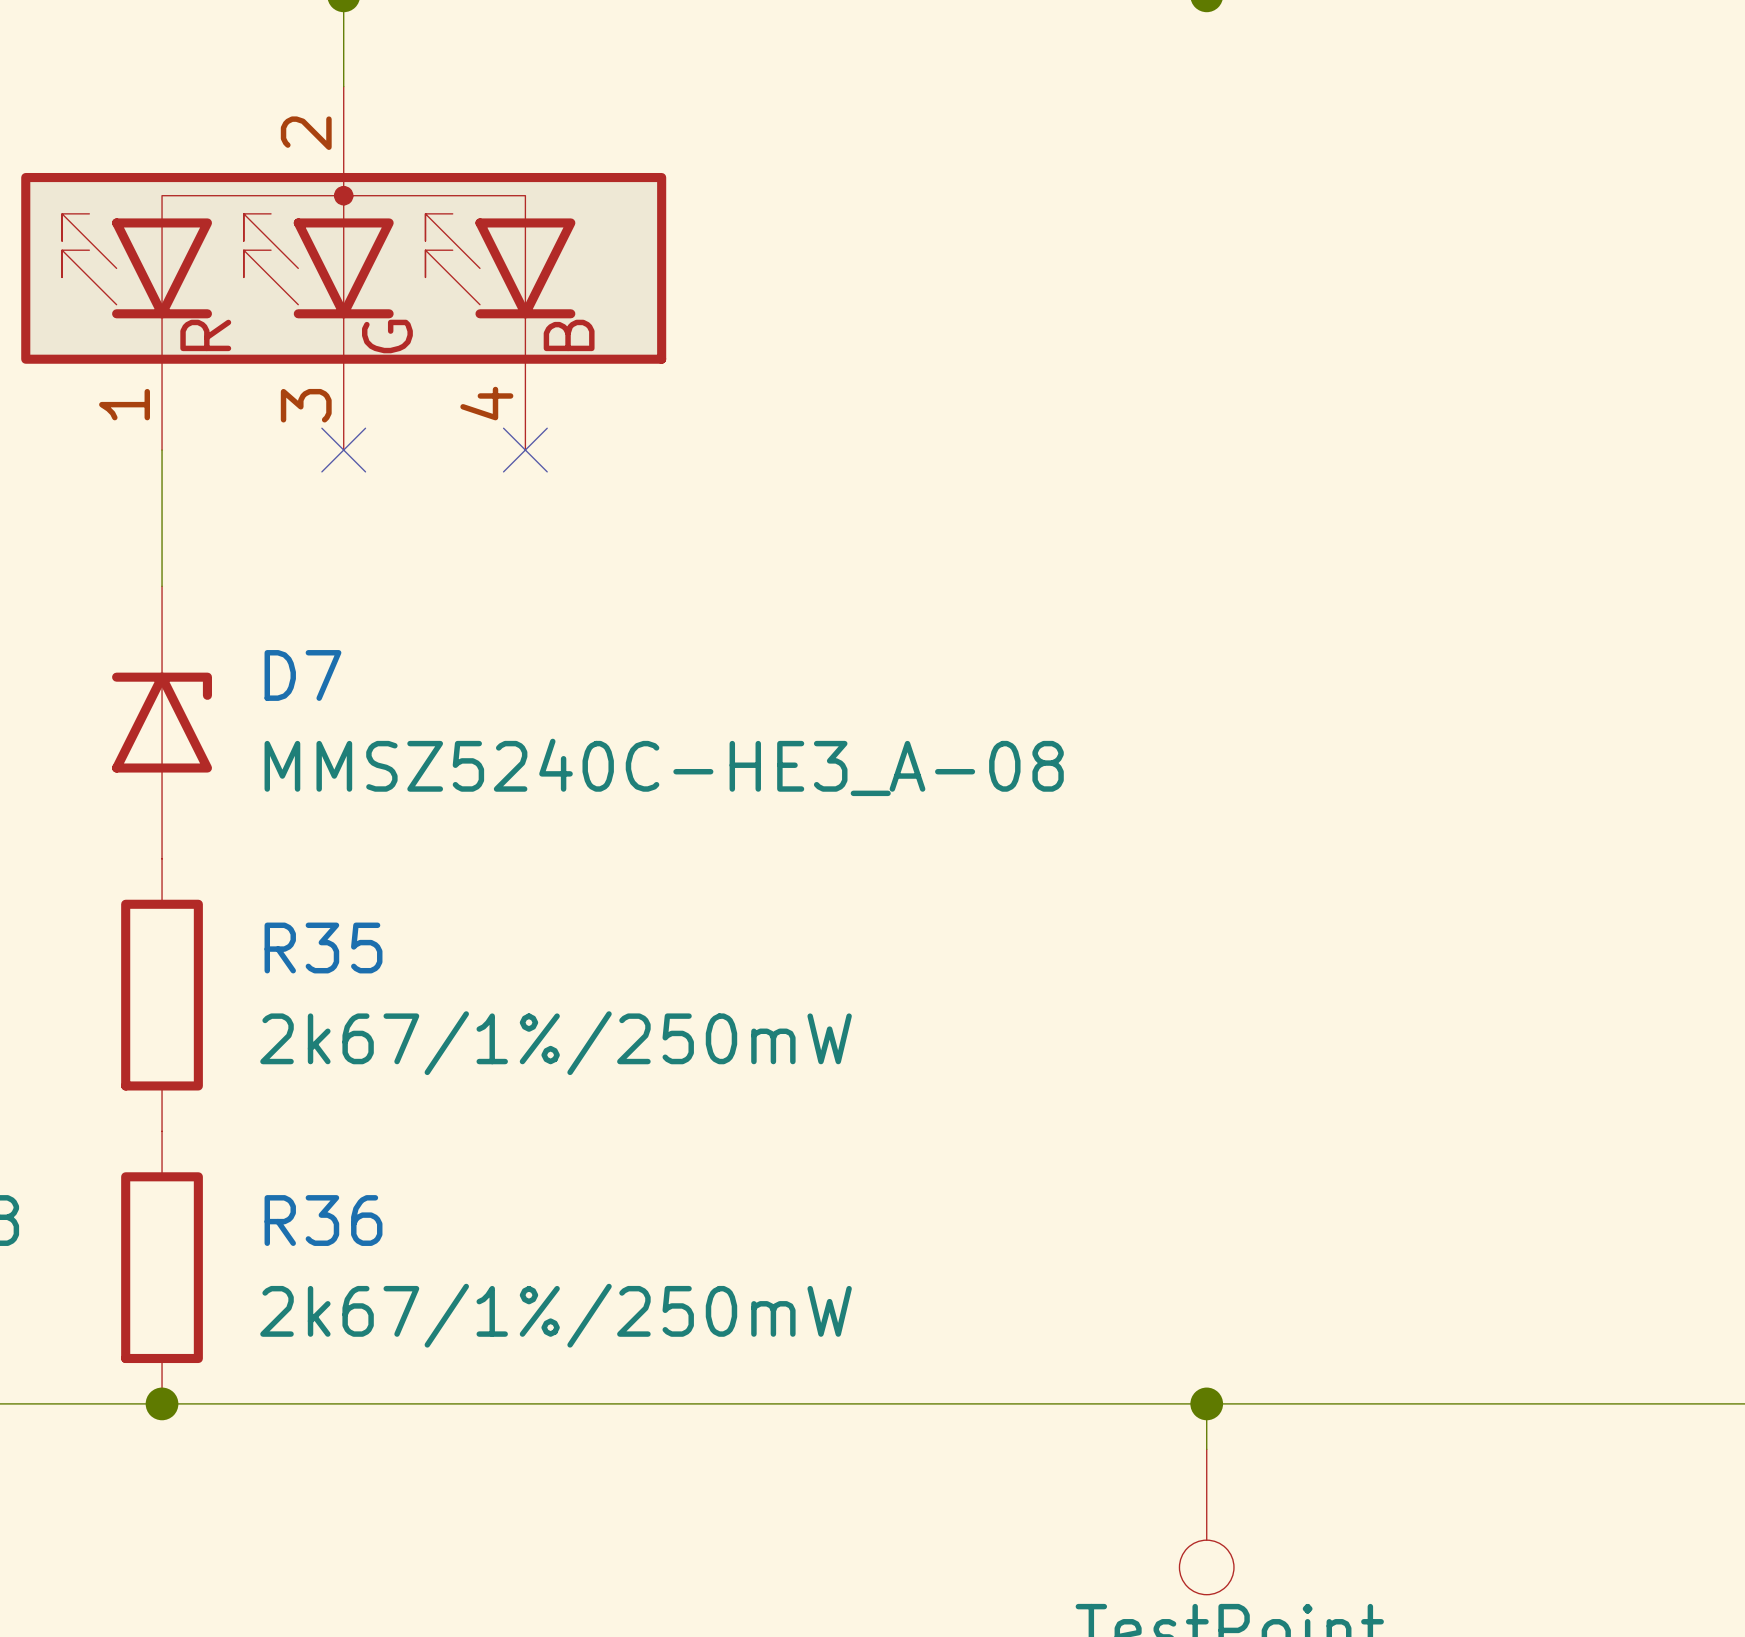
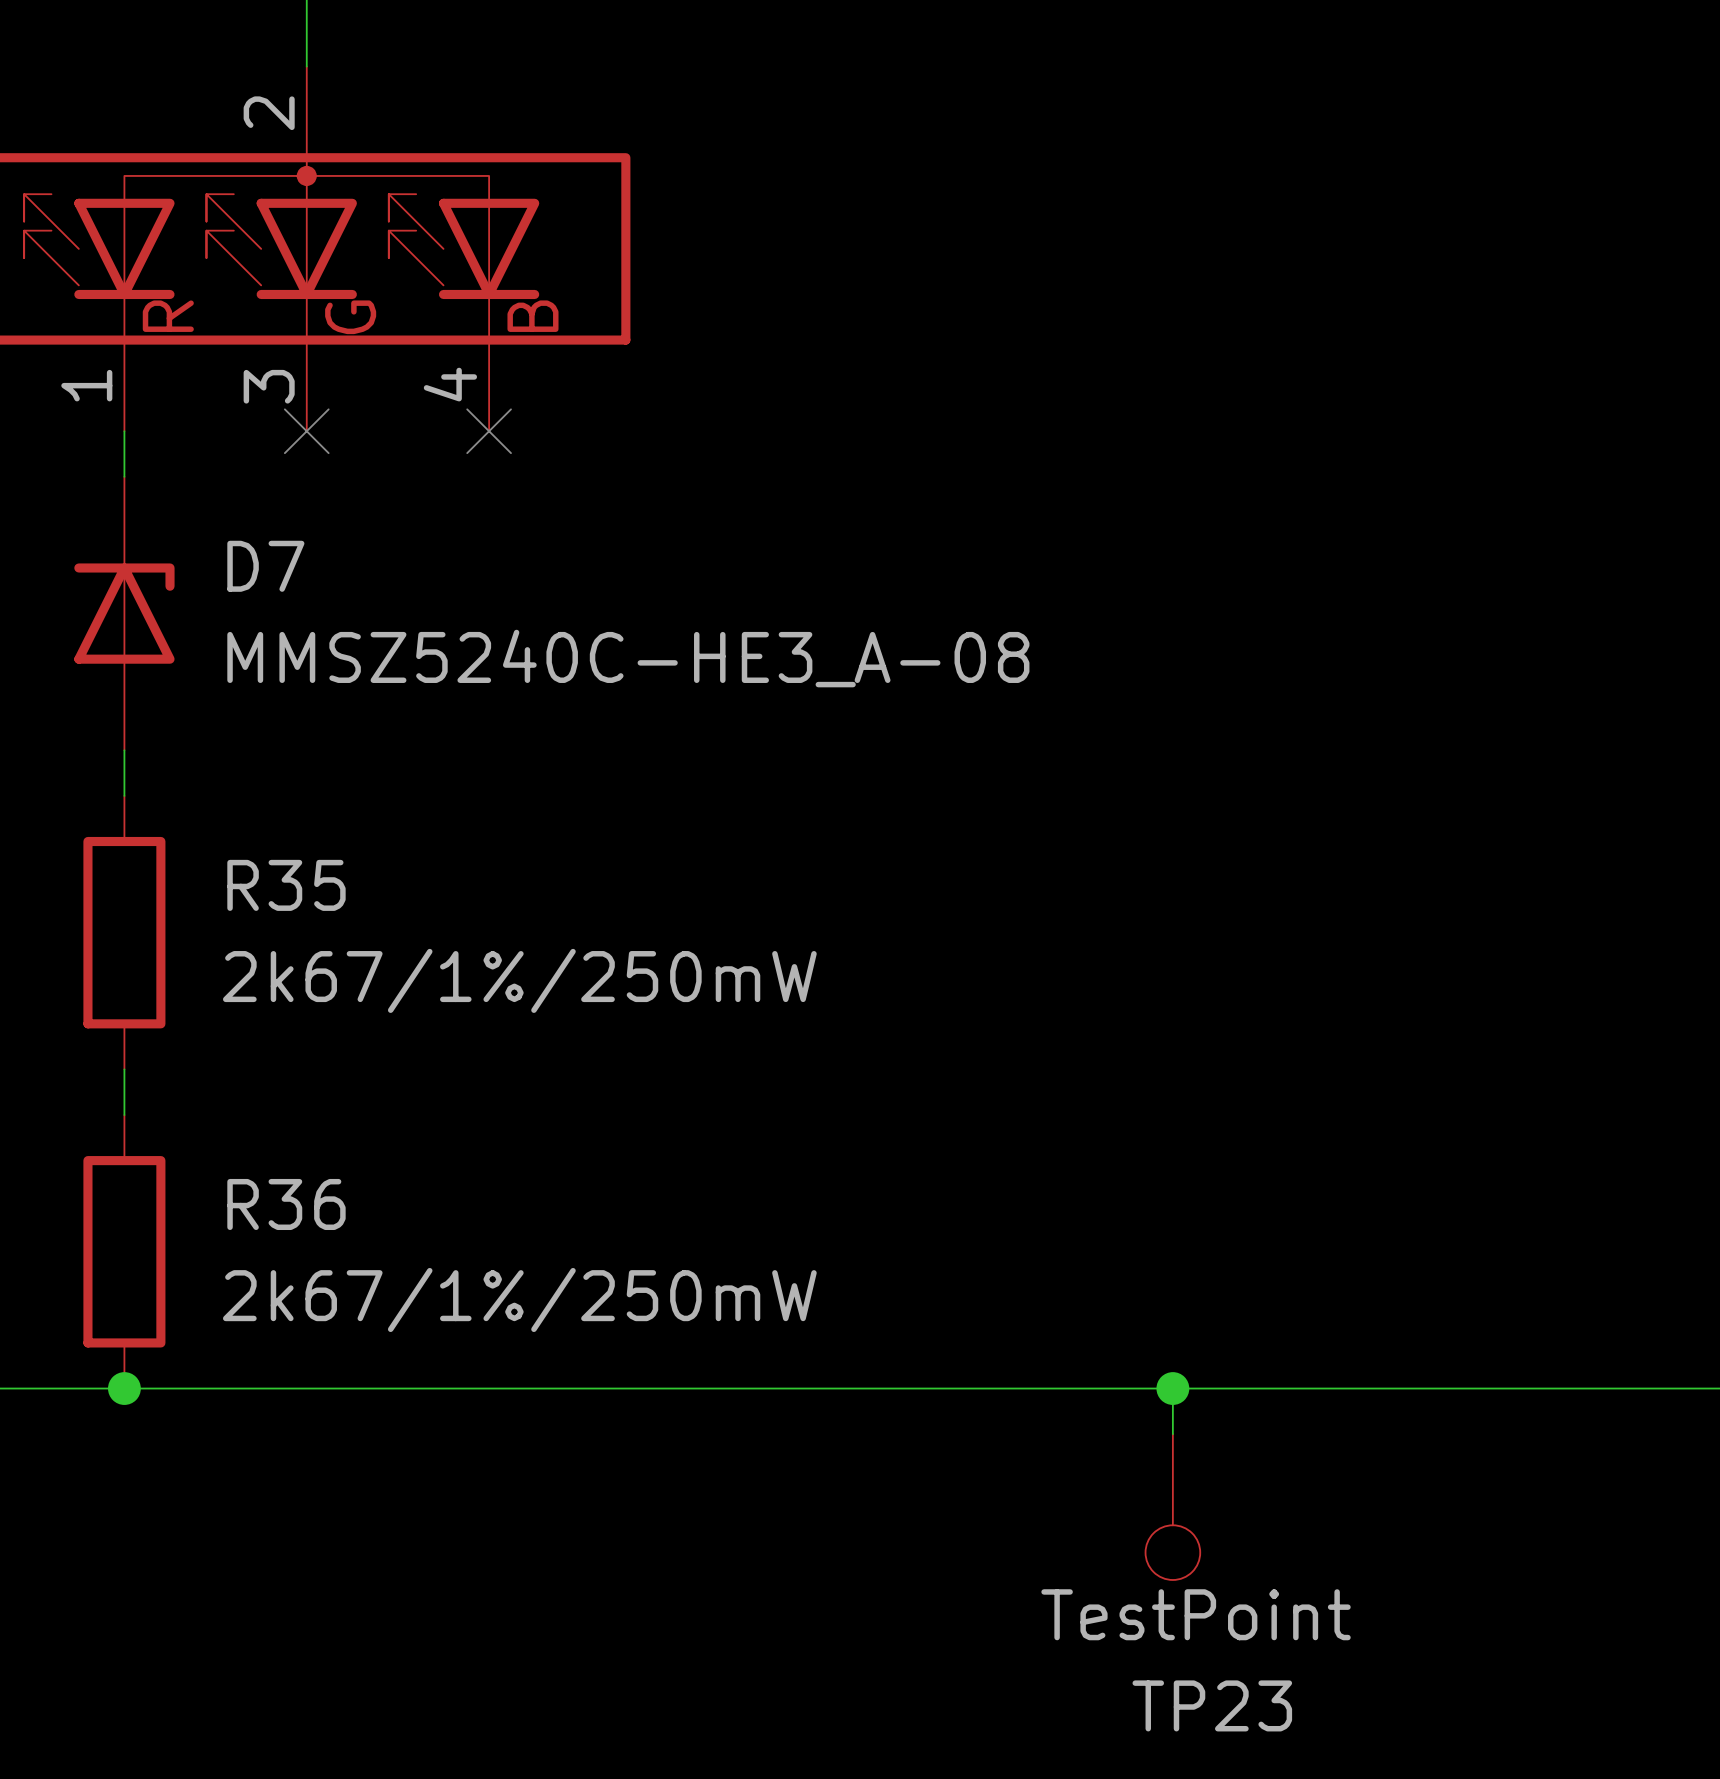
D7 position: (162, 722) -> (124, 613)
R35 position: (162, 995) -> (124, 932)

